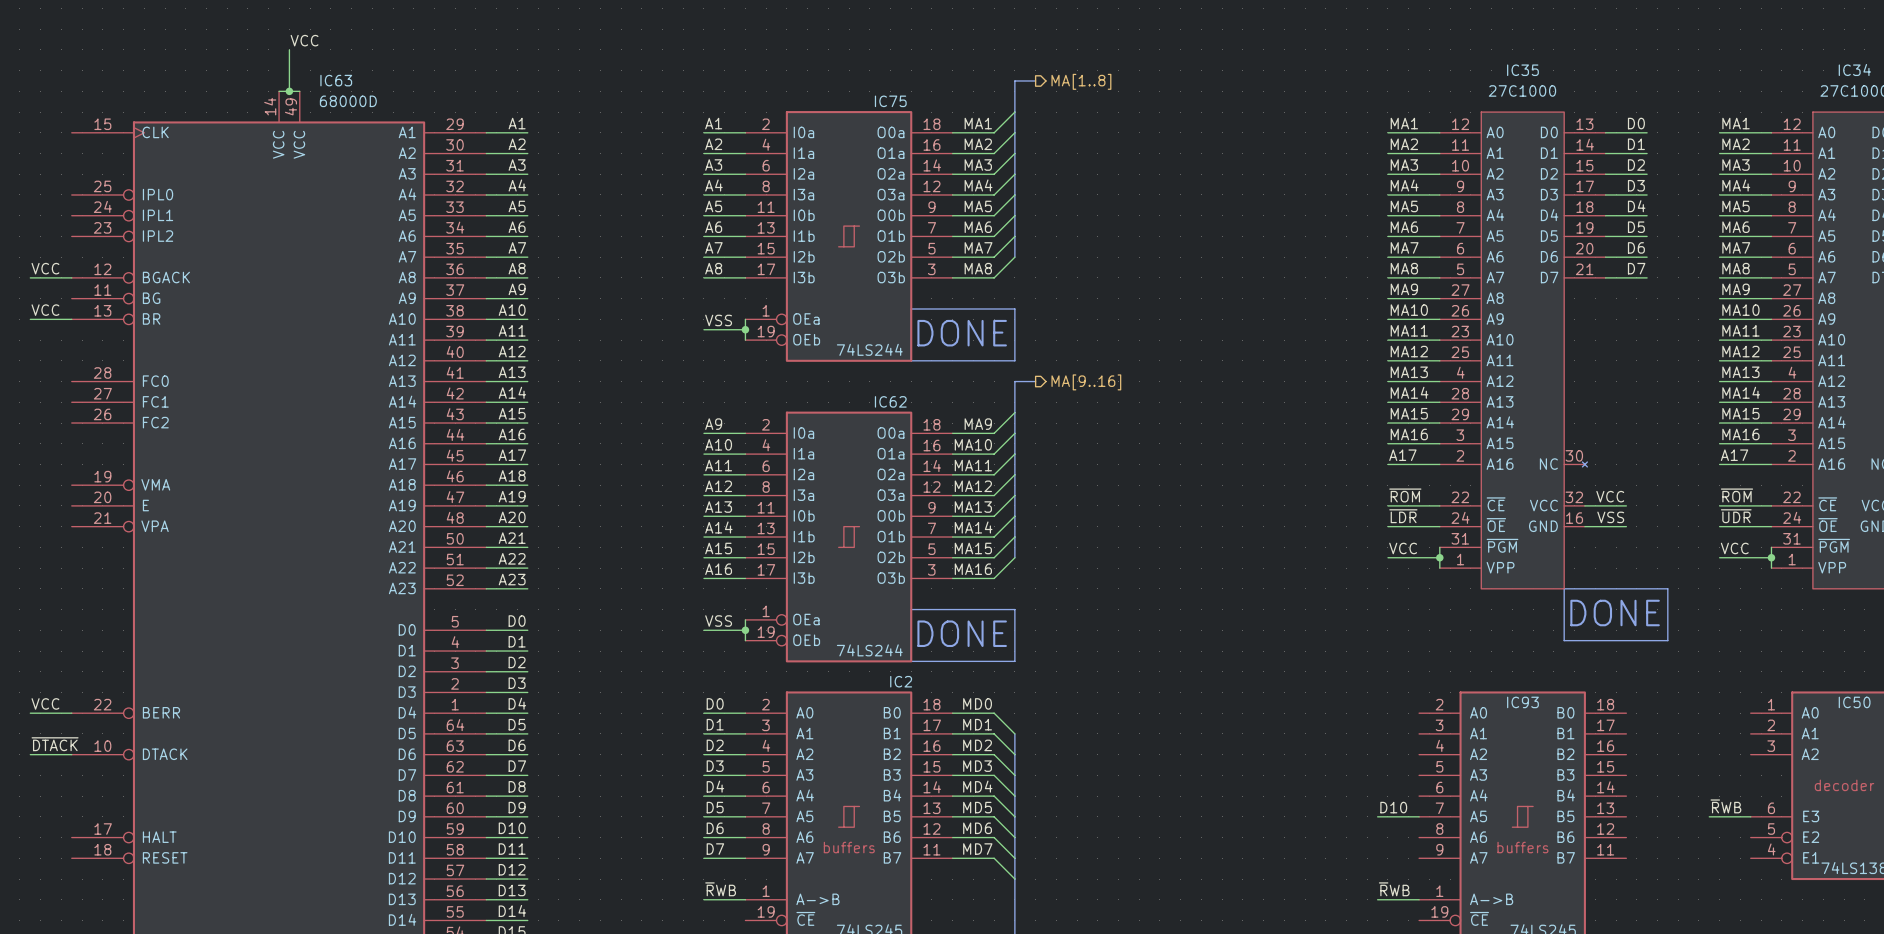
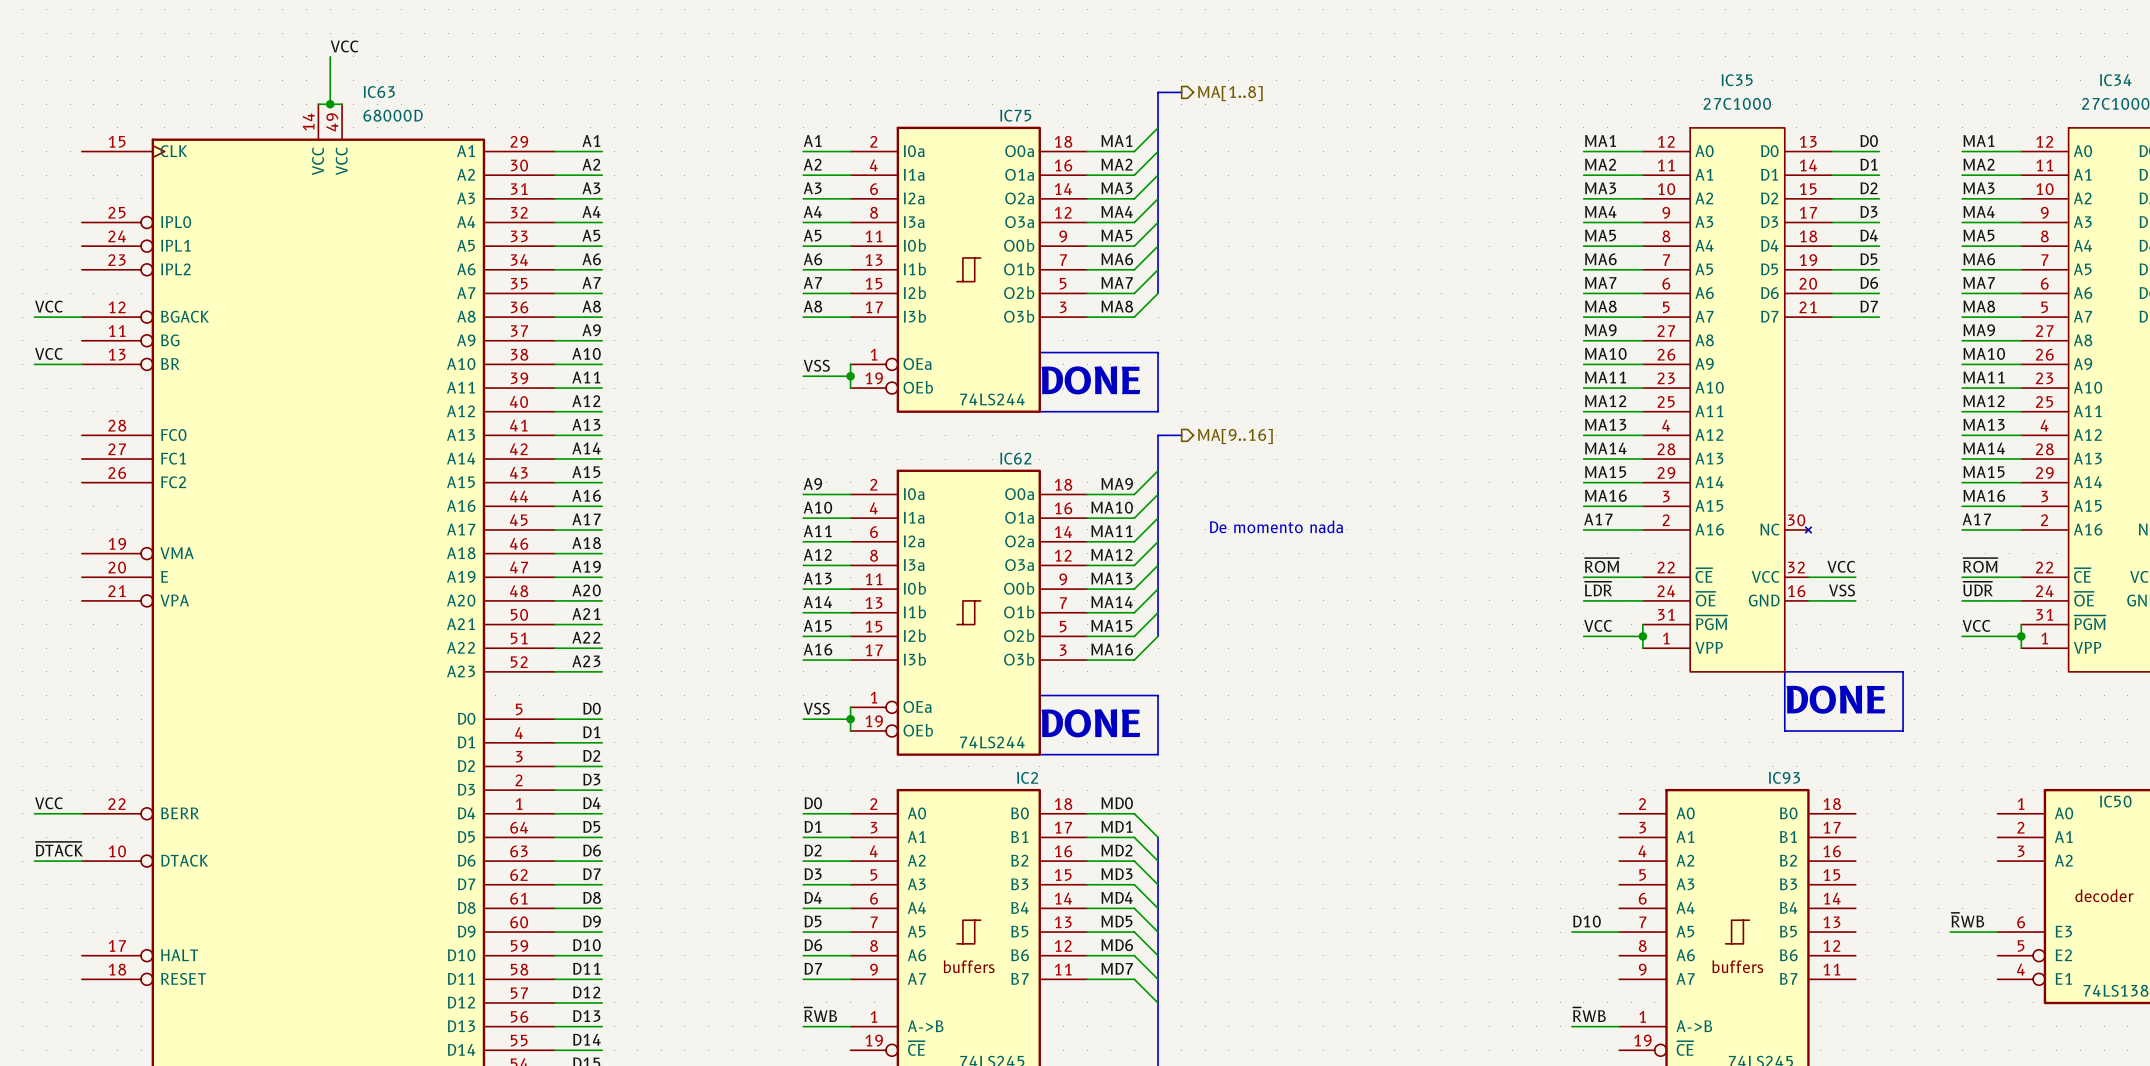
text: none -> De momento nada (1276, 526)
IC93 name position: IC93 (1522, 702) -> IC93 (1784, 777)

